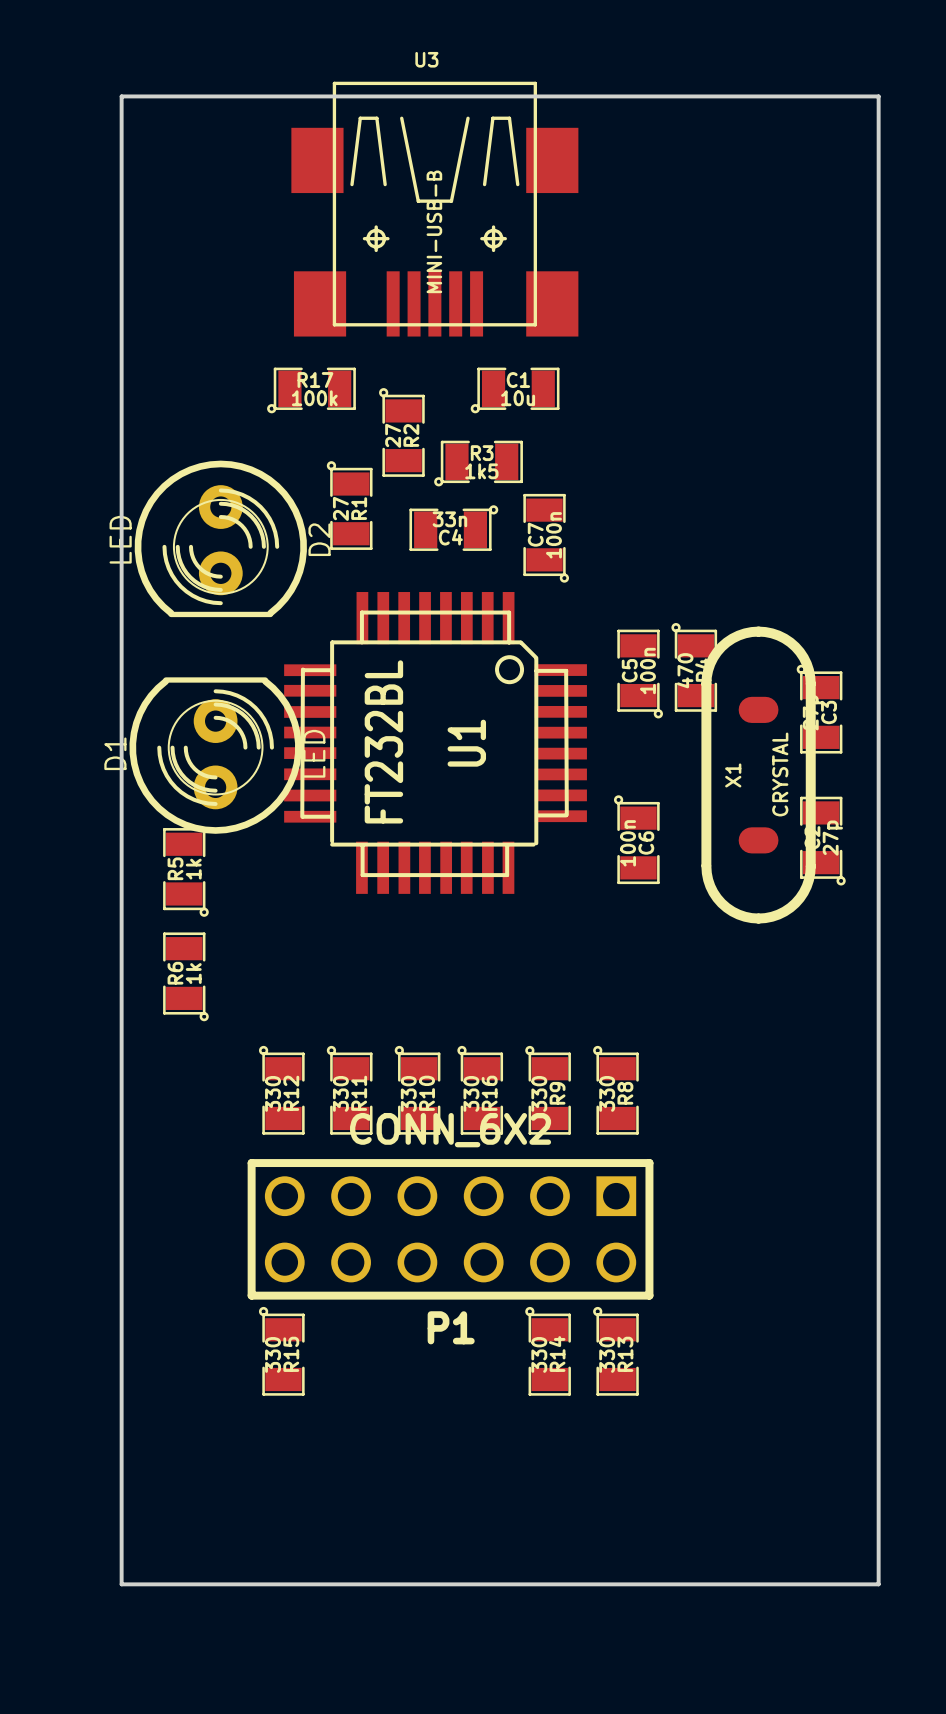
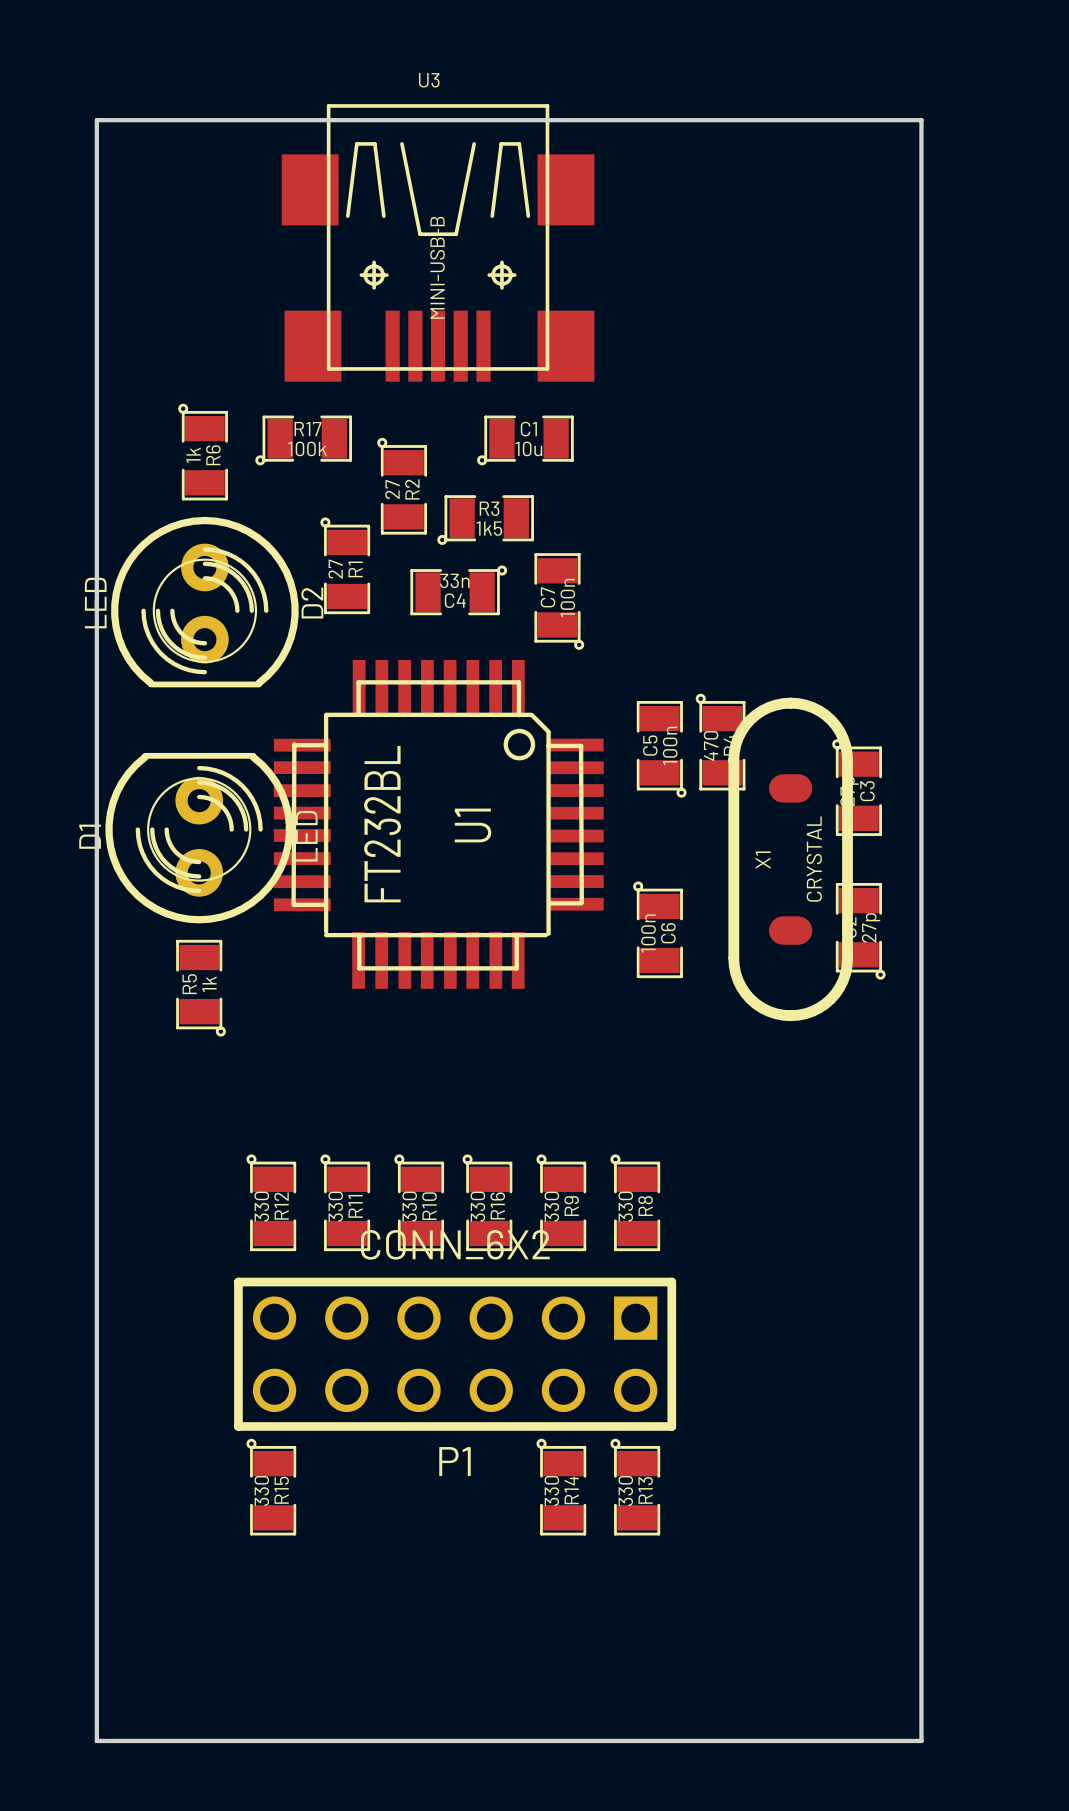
R5 position: (185, 872) -> (201, 988)
R6 rotation: 0° (185, 976) -> 180° (203, 452)
R6 position: (185, 976) -> (203, 452)

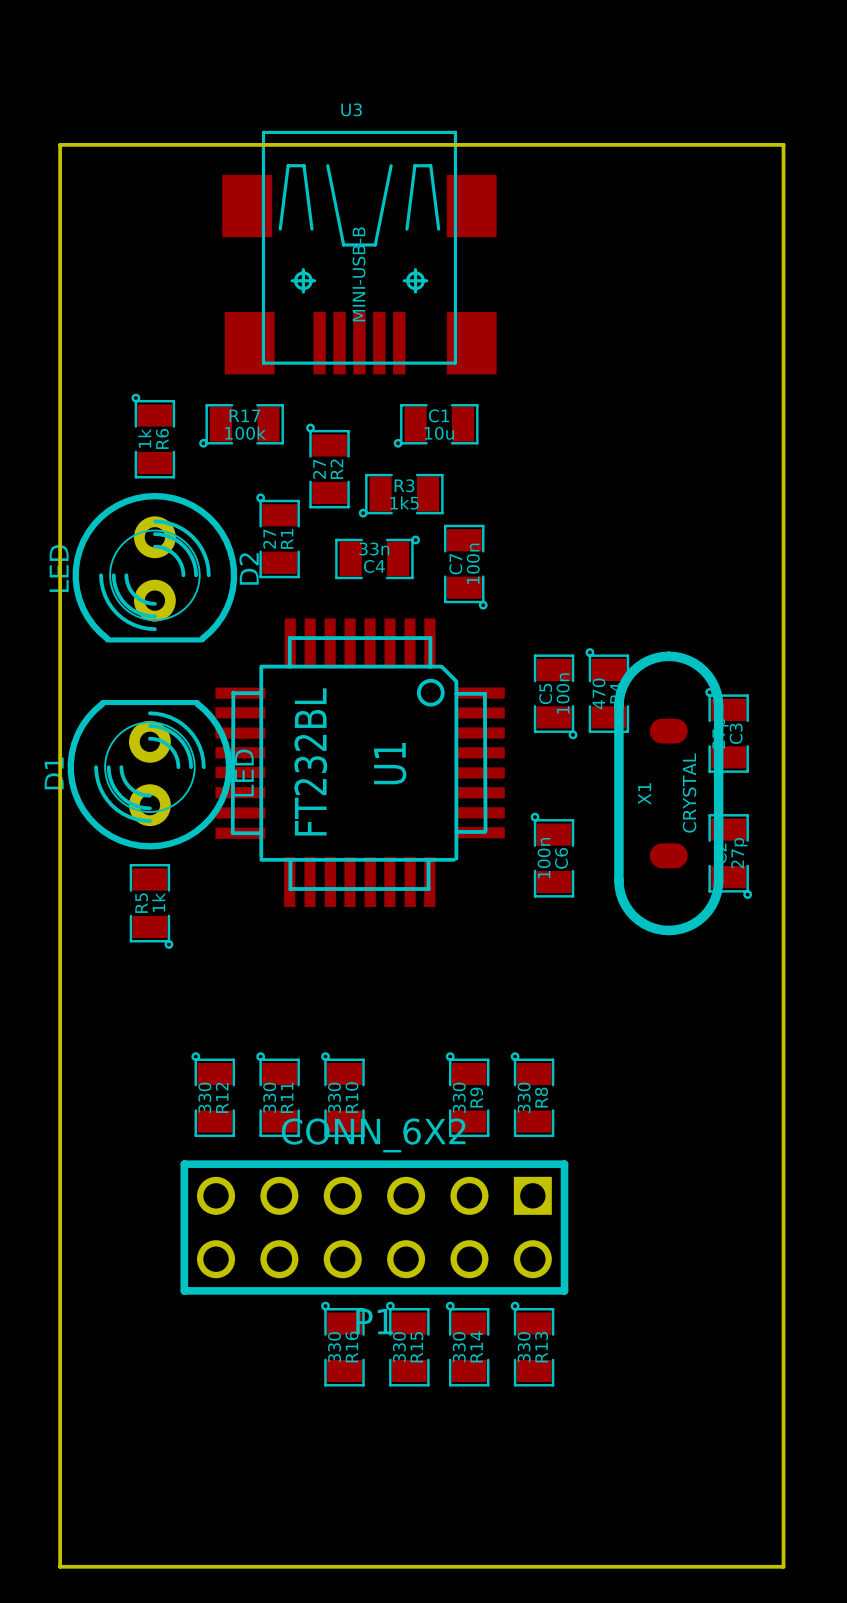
R16 position: (487, 1202) -> (342, 1344)
R15 position: (271, 1487) -> (407, 1344)

